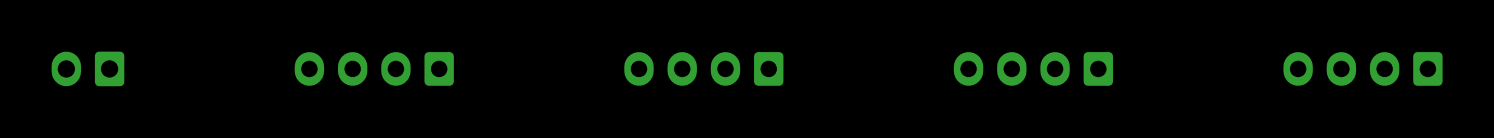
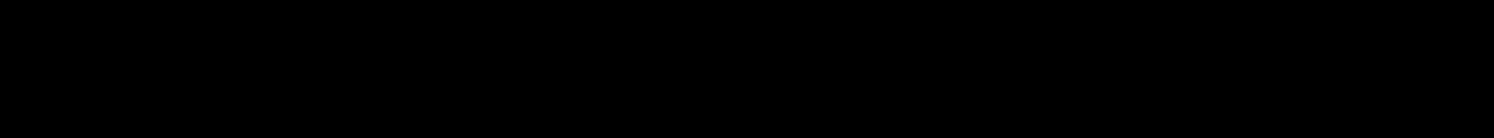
part: (87, 68) -> none
part: (374, 68) -> none
part: (703, 68) -> none
part: (1033, 68) -> none
part: (1363, 68) -> none

